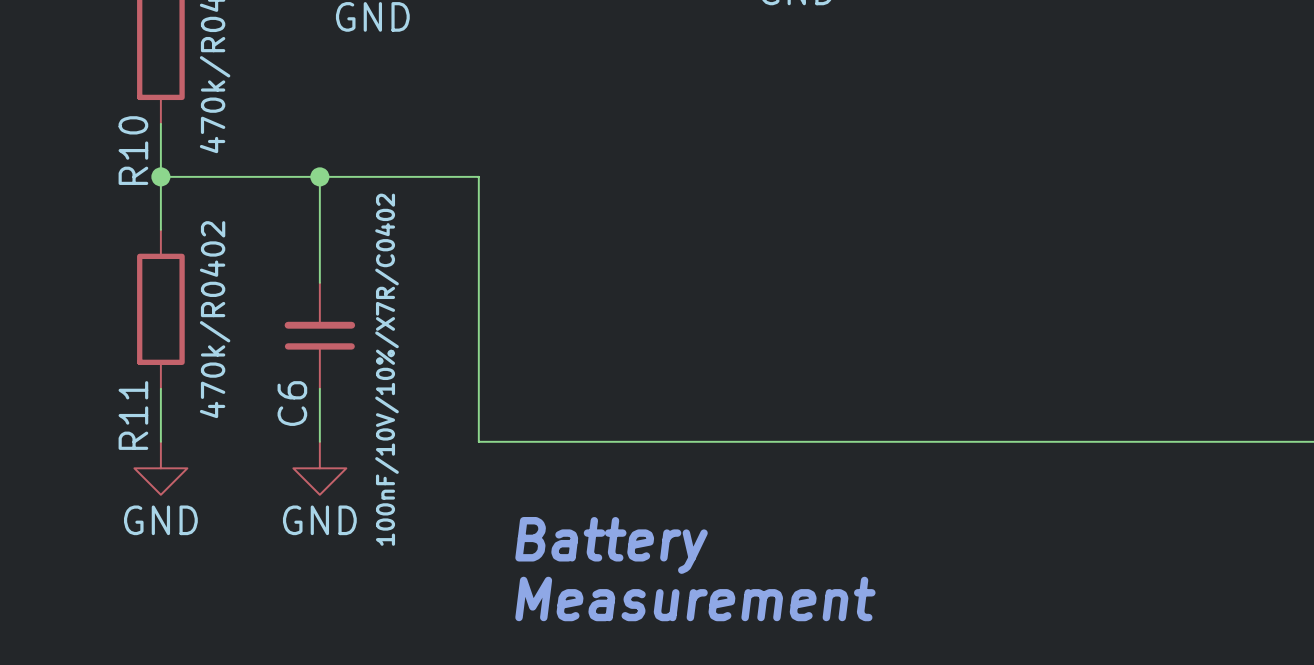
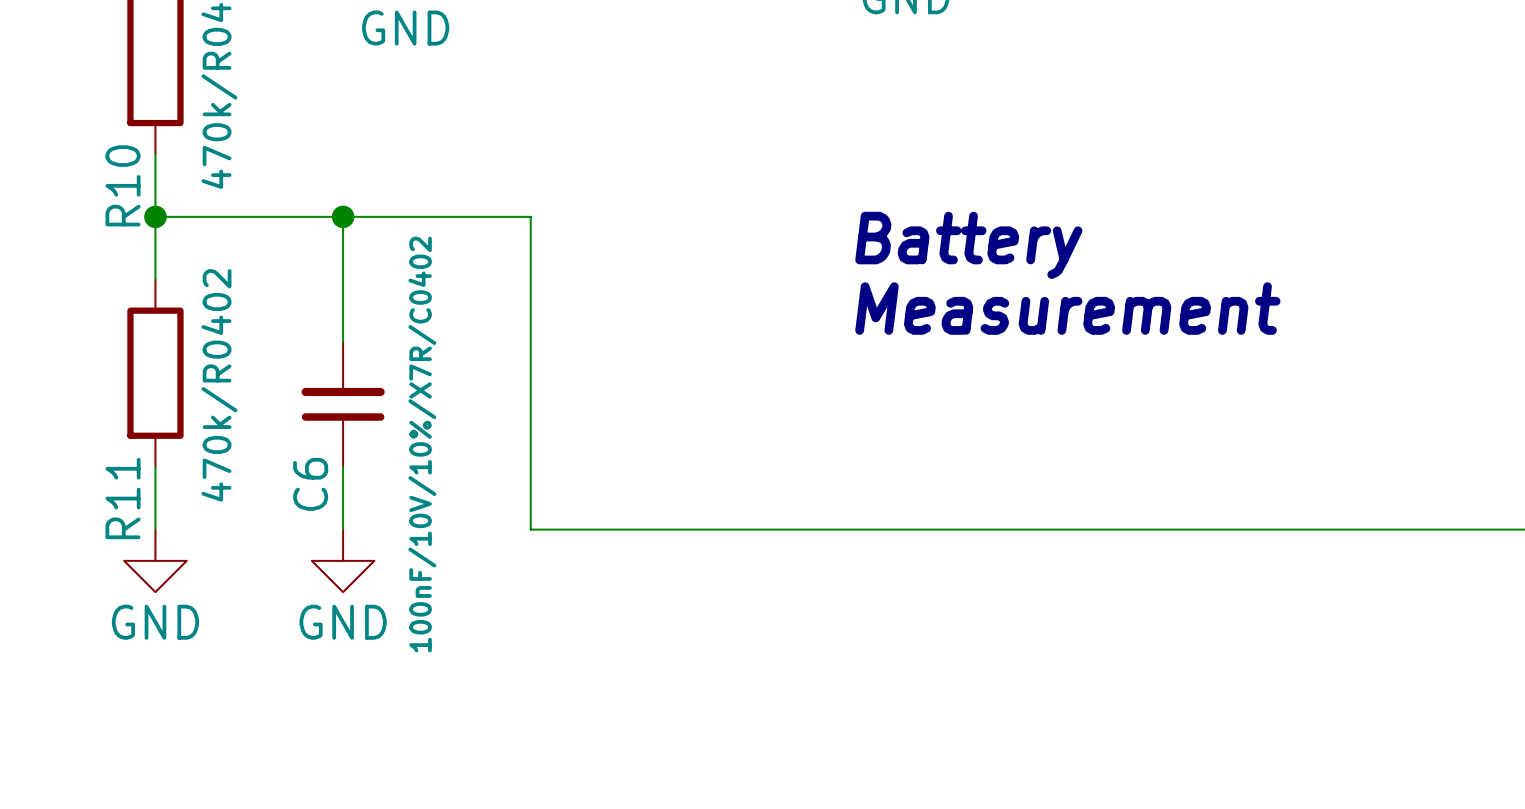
text position: Battery (611, 545) -> Battery (968, 245)
text position: Measurement (695, 598) -> Measurement (1067, 308)

